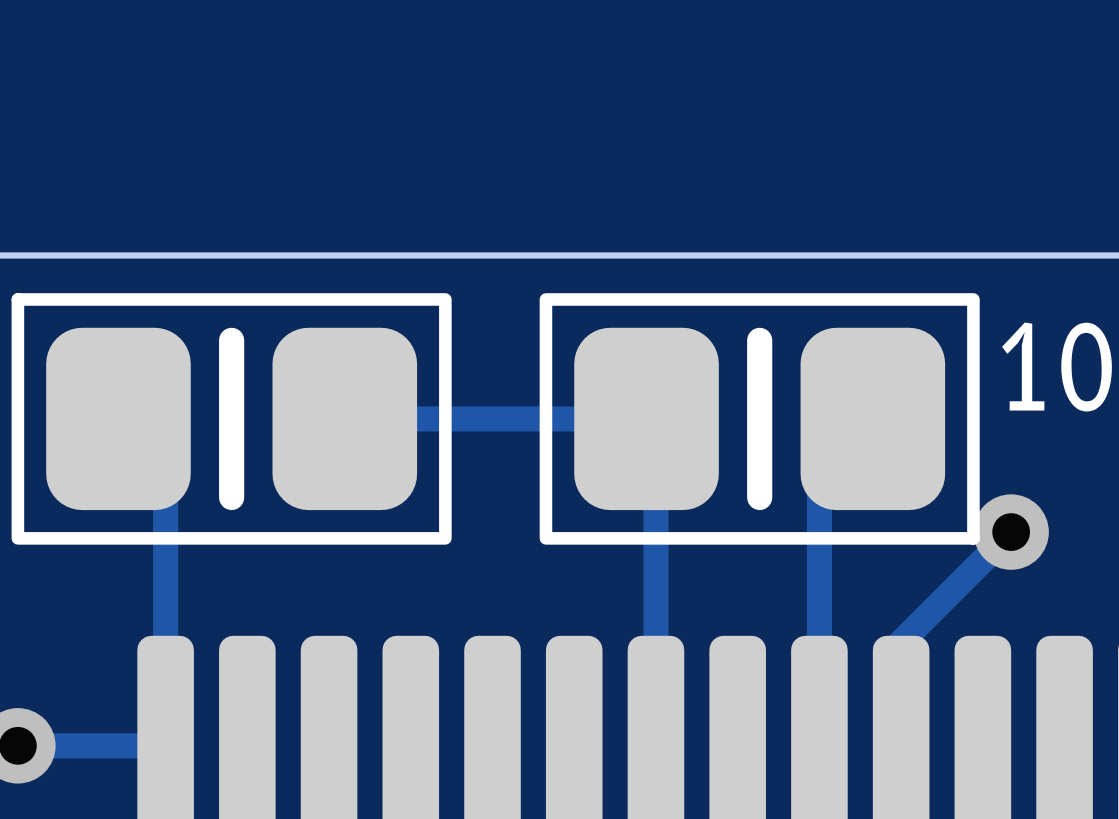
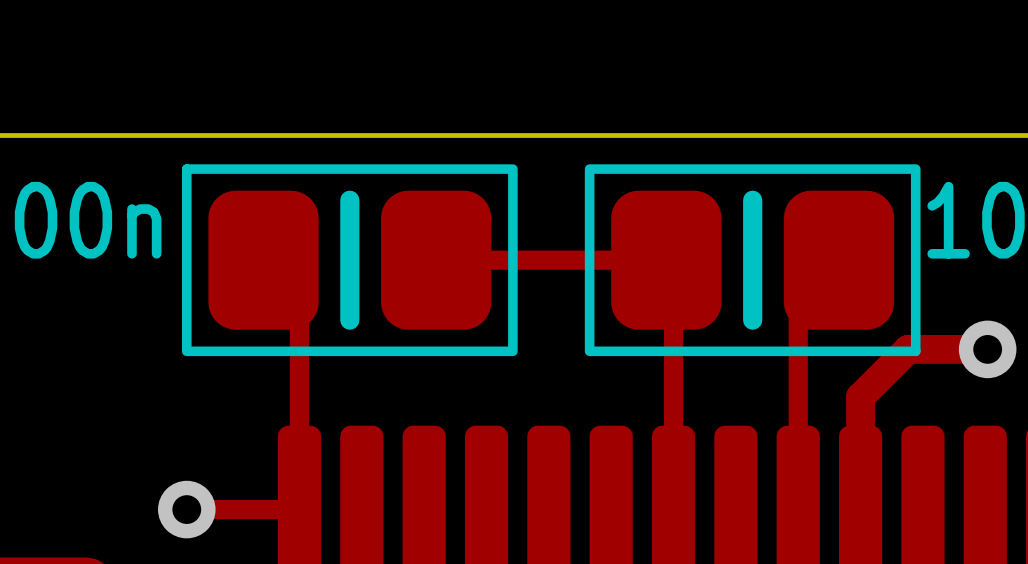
track: (1011, 532) (885, 657) -> none
via position: (1011, 532) -> (987, 349)
track: none -> (987, 349) (908, 349) (860, 396) (860, 430)

